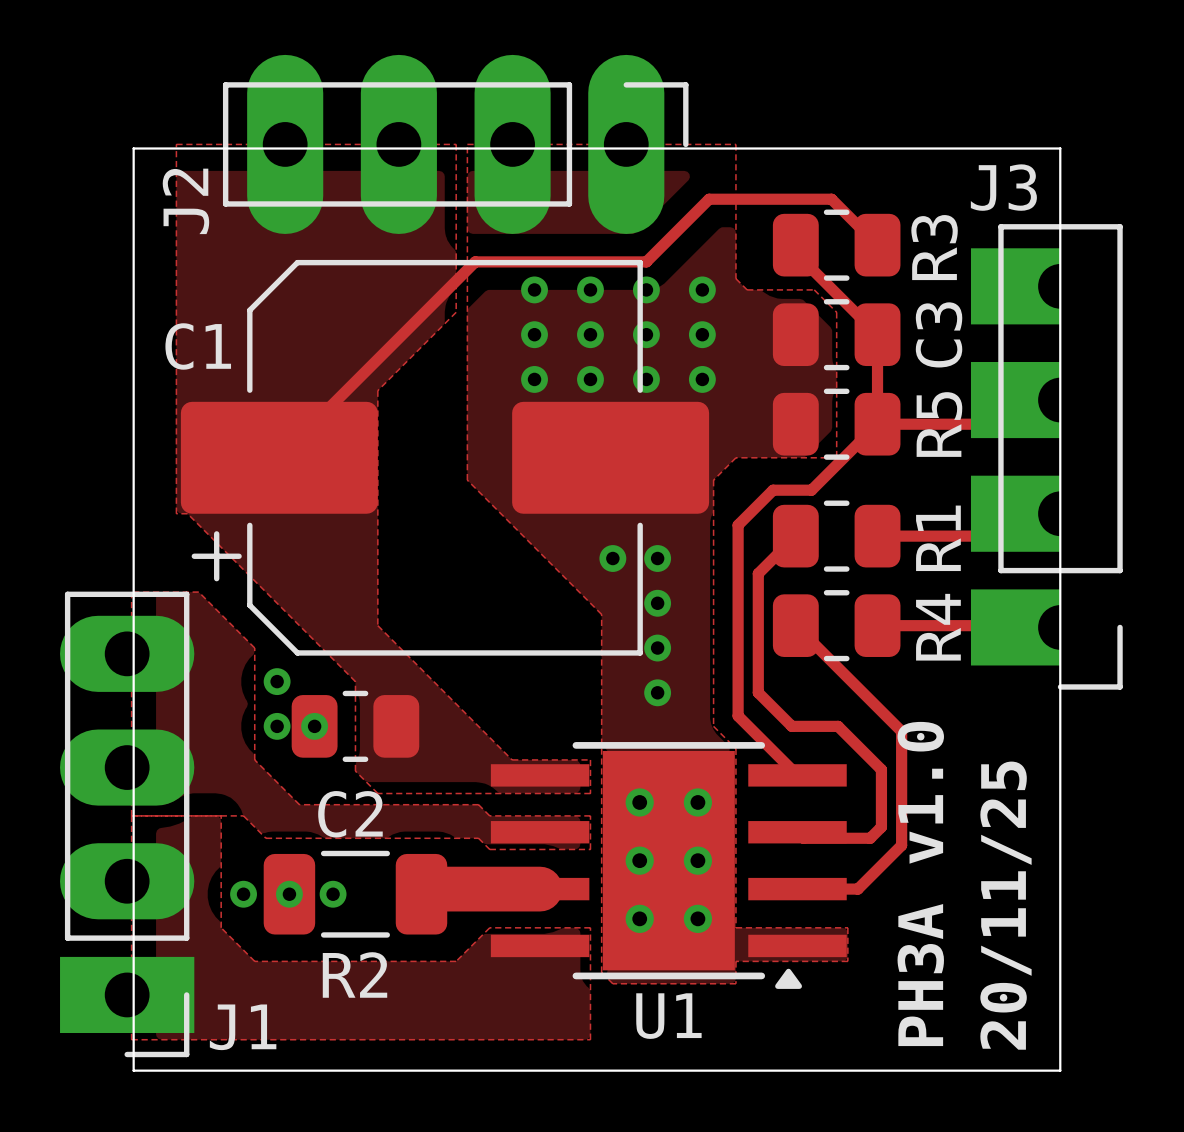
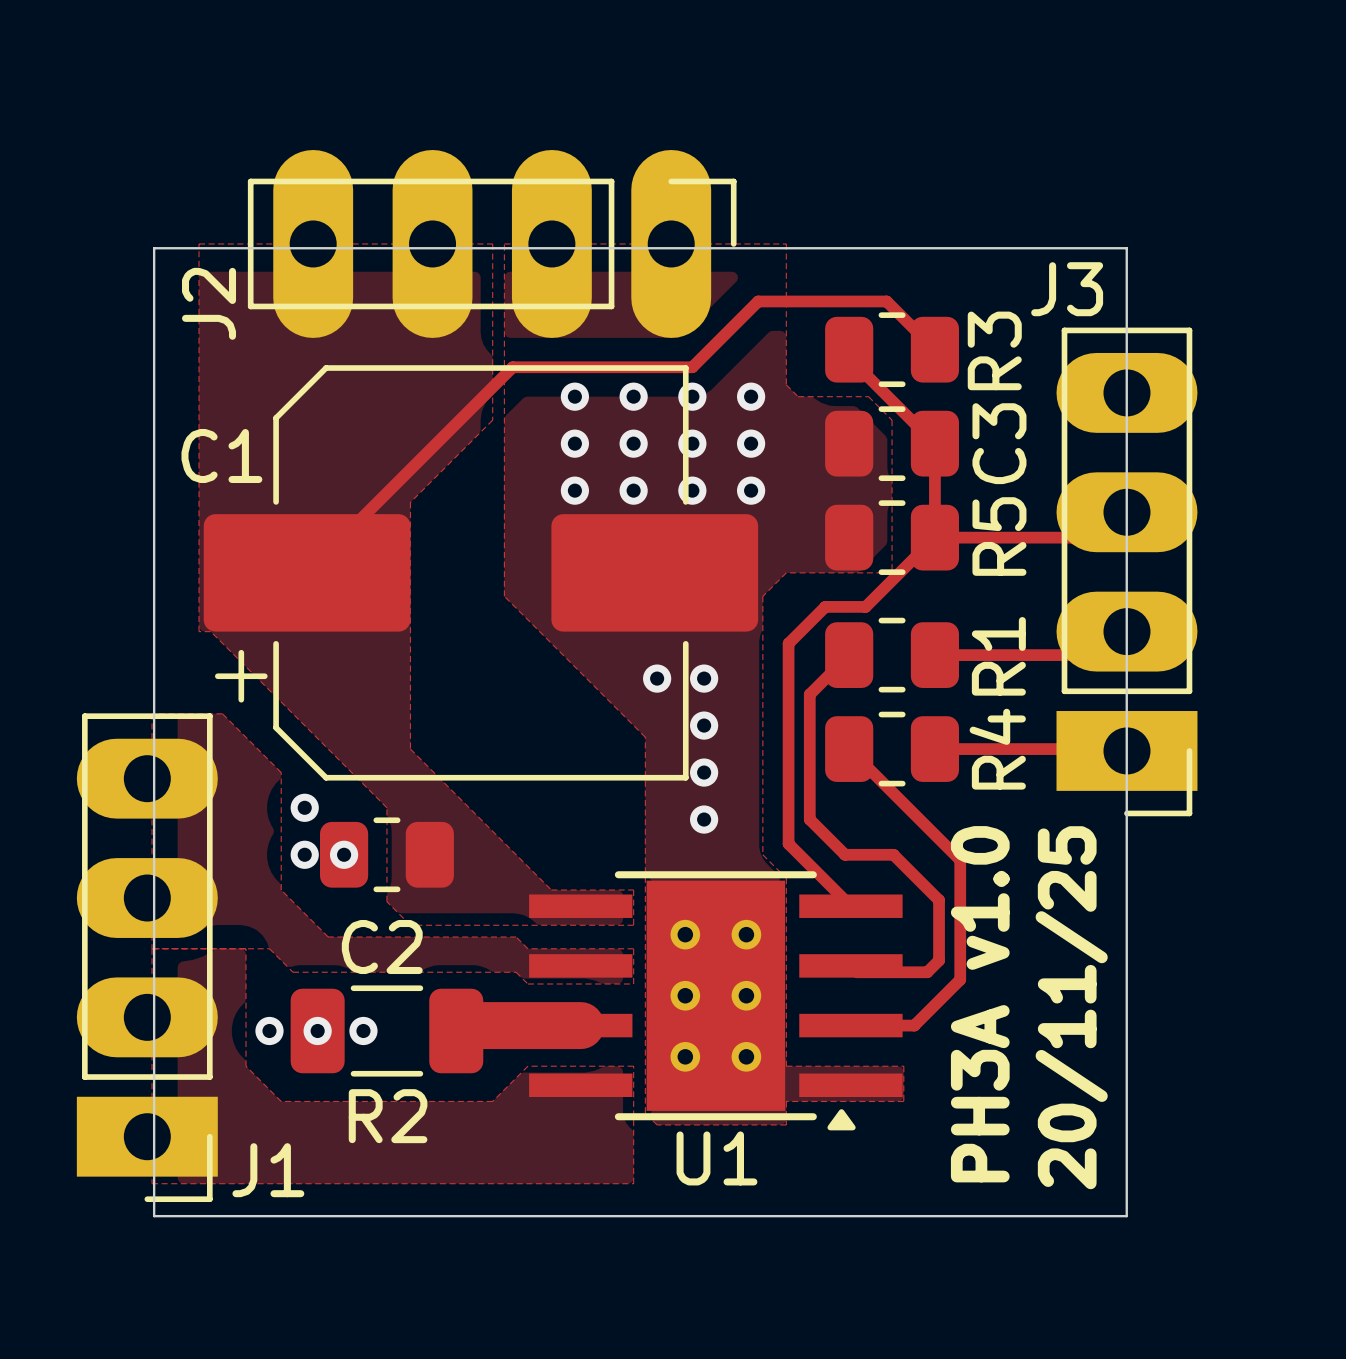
J3 footprint: [970, 224, 1123, 690] -> [1056, 327, 1198, 817]

